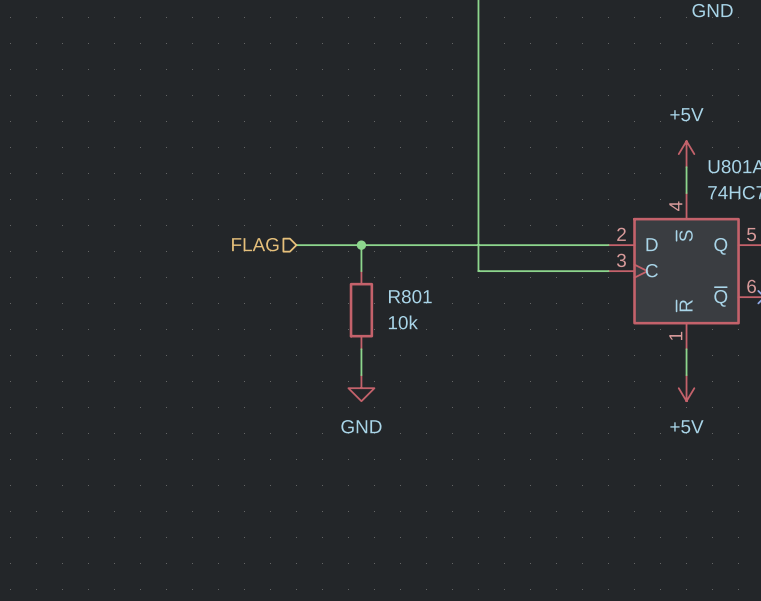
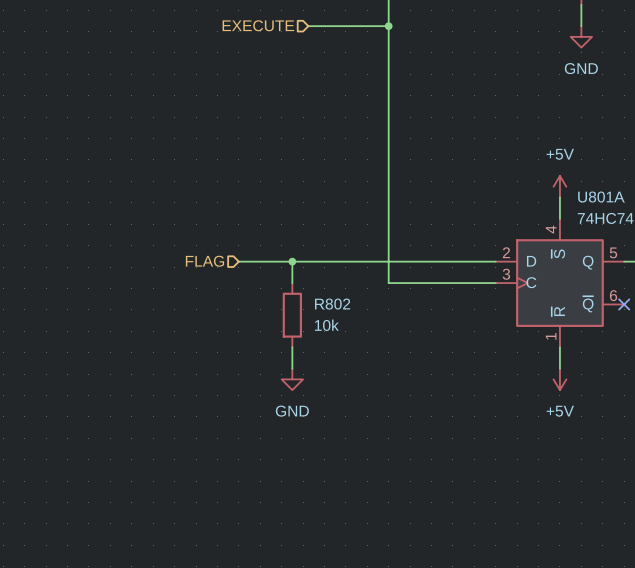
R801 name: R801 (410, 296) -> R802 (332, 304)

